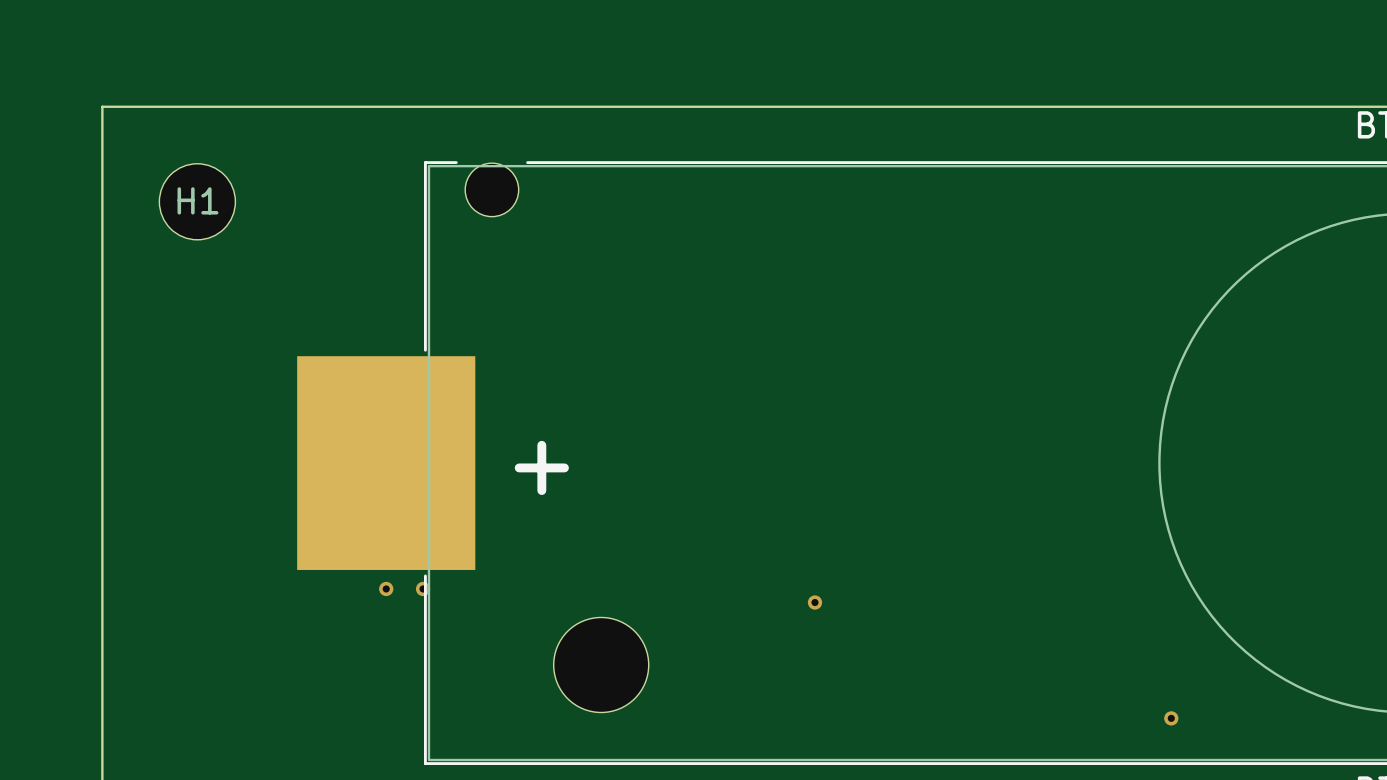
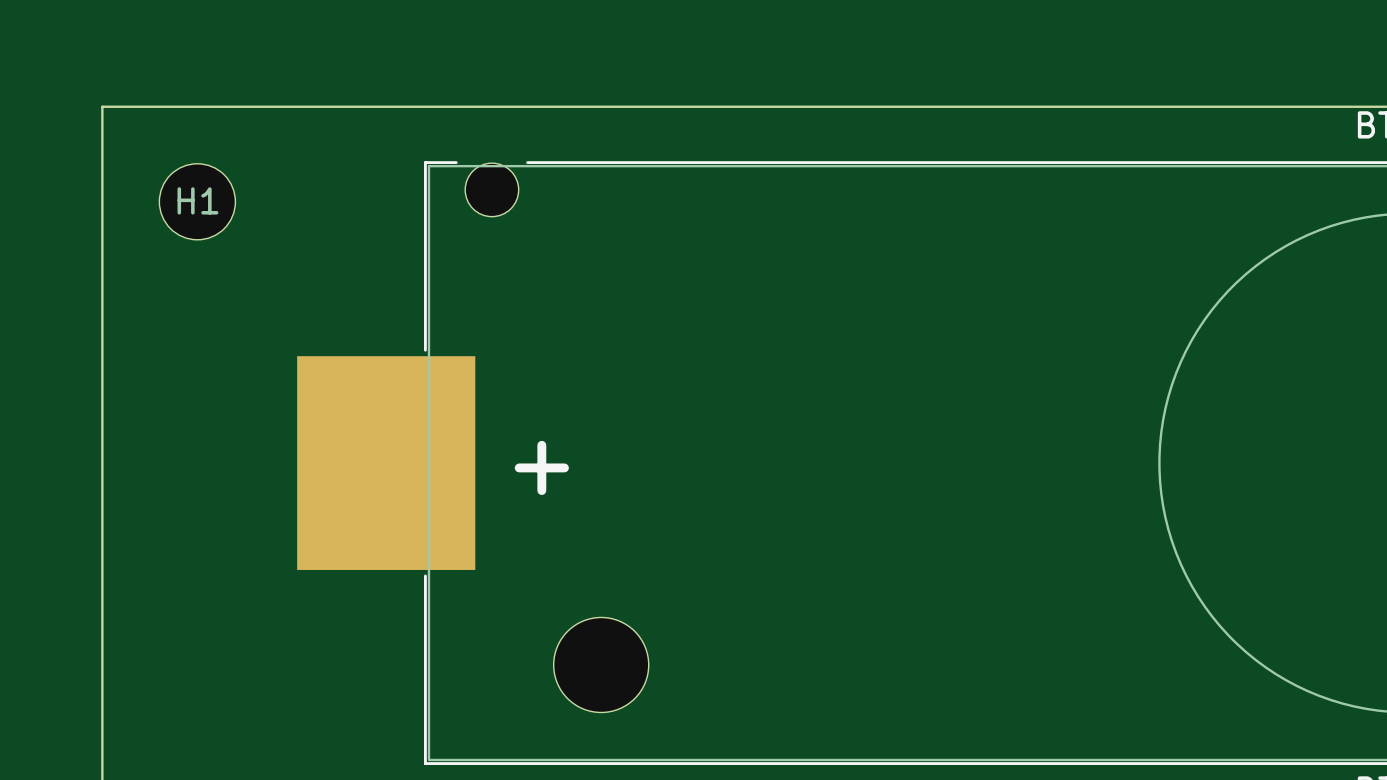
via: (386, 588) -> none
via: (423, 588) -> none
via: (814, 602) -> none
via: (1171, 718) -> none

